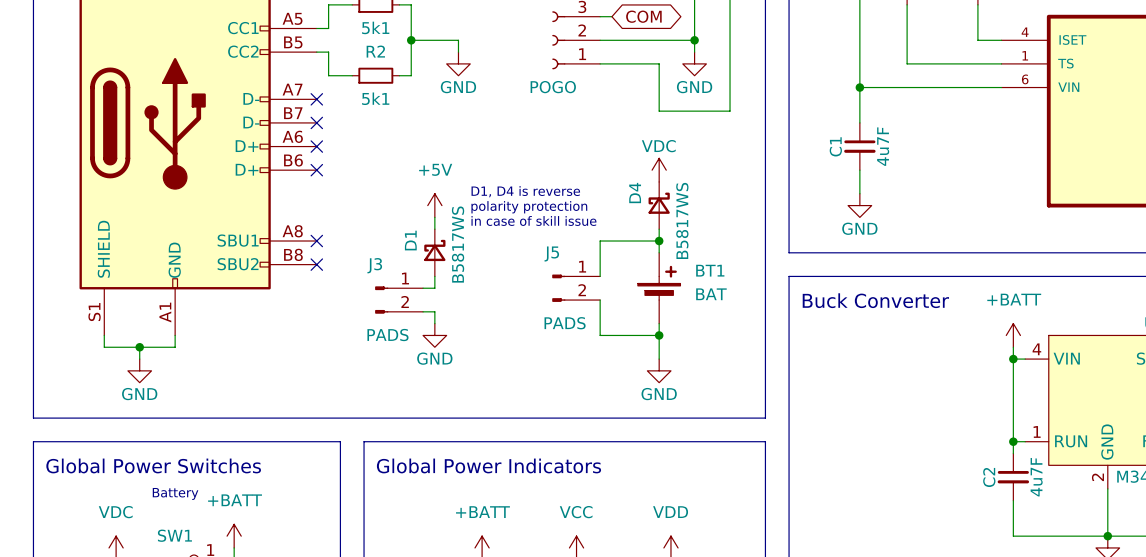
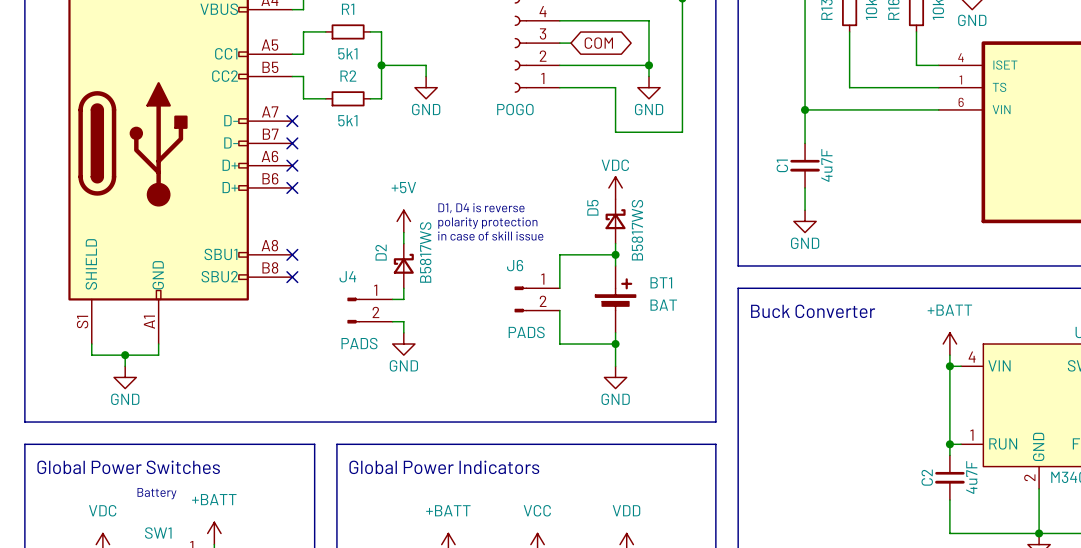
D4 name: D4 (635, 193) -> D5 (592, 207)
D1 name: D1 (410, 240) -> D2 (381, 252)
J5 name: J5 (551, 253) -> J6 (515, 265)
J3 name: J3 (374, 265) -> J4 (347, 276)

